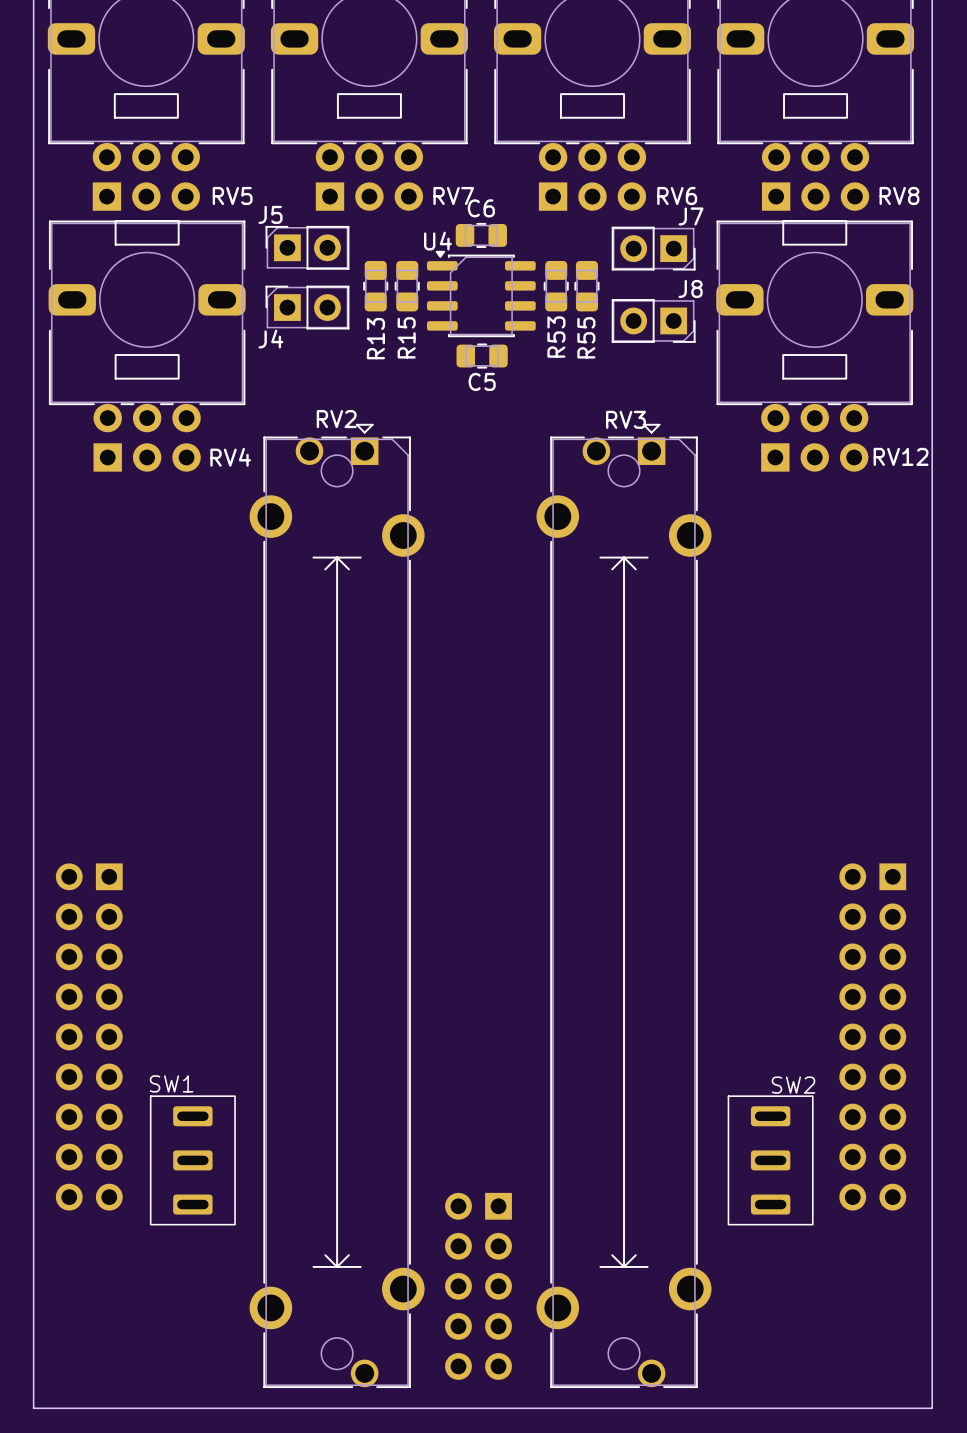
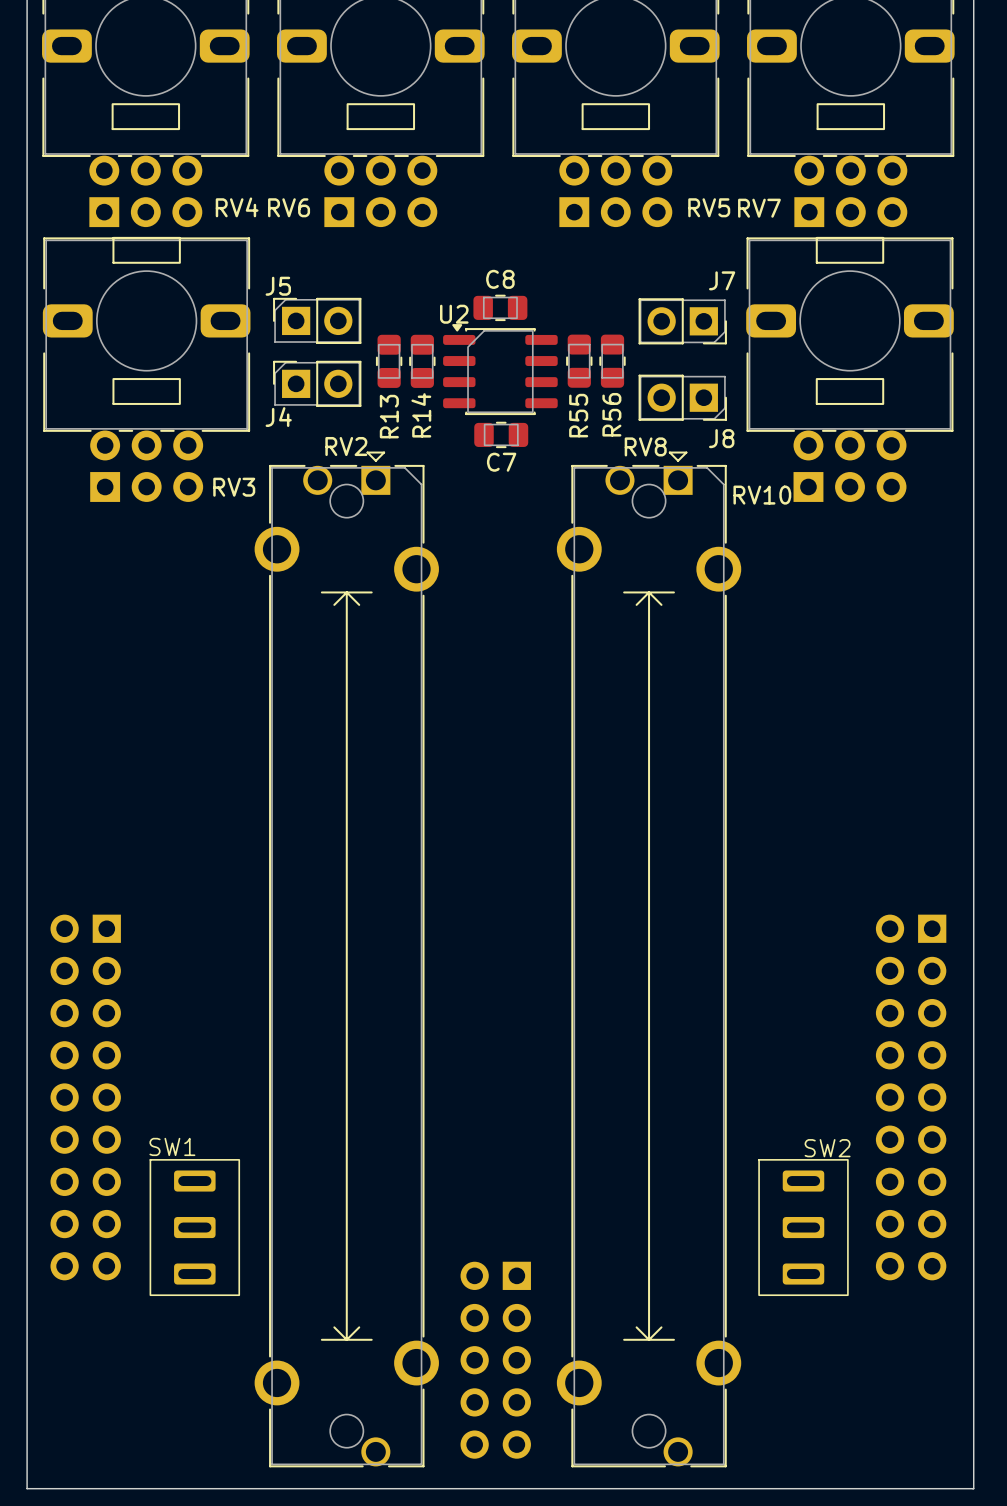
RV5 name: RV5 (232, 195) -> RV4 (237, 207)
RV7 name: RV7 (453, 195) -> RV6 (289, 207)
RV6 name: RV6 (677, 195) -> RV5 (709, 207)
RV8 name: RV8 (899, 195) -> RV7 (759, 208)
J7 name position: J7 (691, 216) -> J7 (722, 280)
C6: (481, 235) -> none
J5 position: (307, 247) -> (317, 320)
J7 position: (653, 248) -> (682, 321)
R13 position: (375, 286) -> (389, 361)
R15: (407, 286) -> none
R53: (556, 286) -> none
R55 position: (586, 286) -> (579, 361)
C8: none -> (500, 307)
J8 name position: J8 (690, 288) -> J8 (721, 438)
U4: (481, 294) -> none
J4 position: (307, 307) -> (317, 383)
J8 position: (653, 320) -> (682, 397)
R14: none -> (422, 361)
R56: none -> (612, 361)
U2: none -> (500, 369)
C5: (482, 356) -> none
C7: none -> (501, 434)
RV3 name: RV3 (625, 419) -> RV8 (645, 446)
RV12 name: RV12 (901, 456) -> RV10 (762, 495)
RV4 name: RV4 (230, 457) -> RV3 (234, 487)

